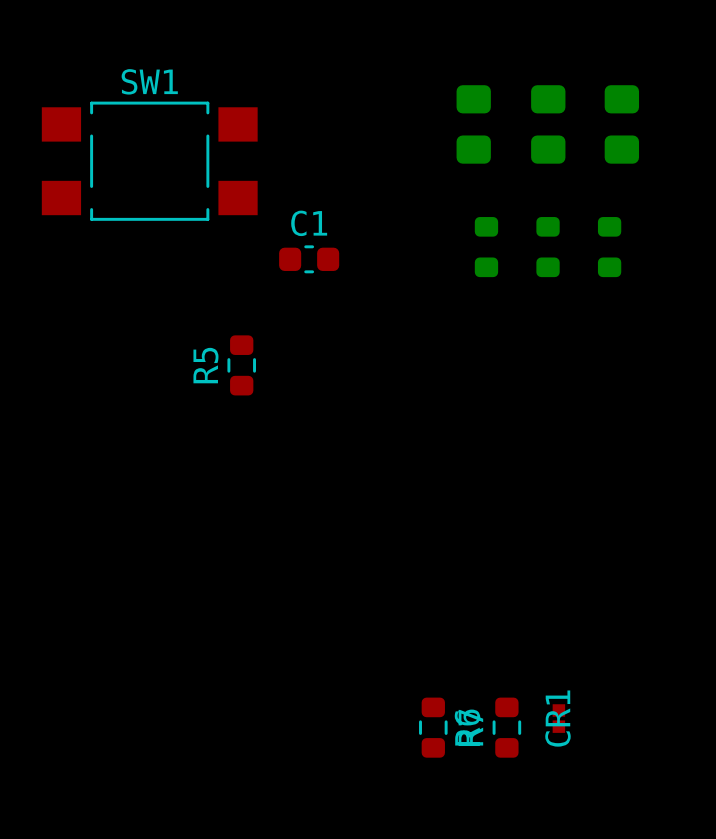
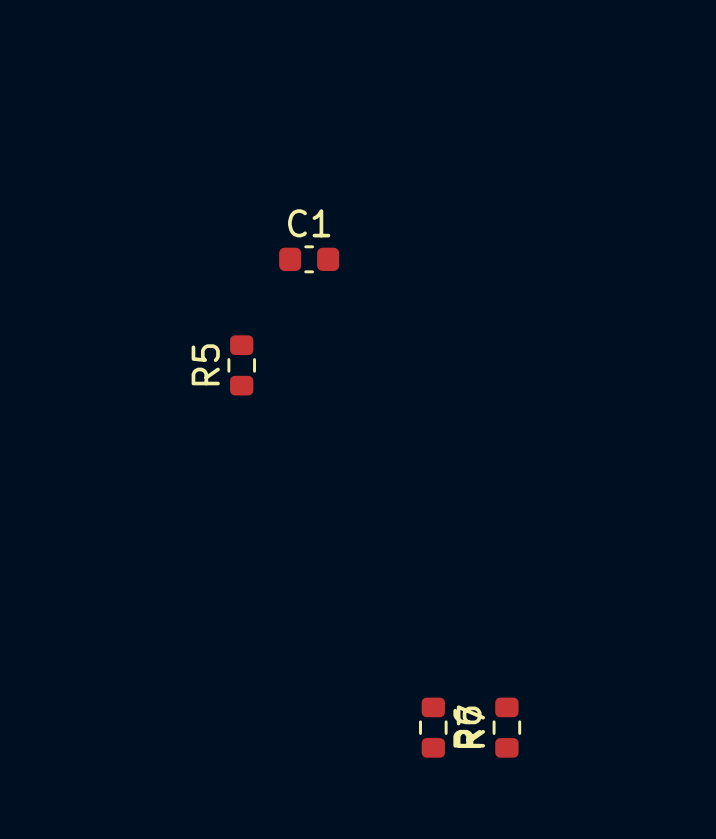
part: (473, 124) -> none
part: (548, 124) -> none
part: (621, 124) -> none
SW1: (149, 161) -> none
part: (486, 247) -> none
part: (548, 247) -> none
part: (609, 247) -> none
CR1: (558, 718) -> none

